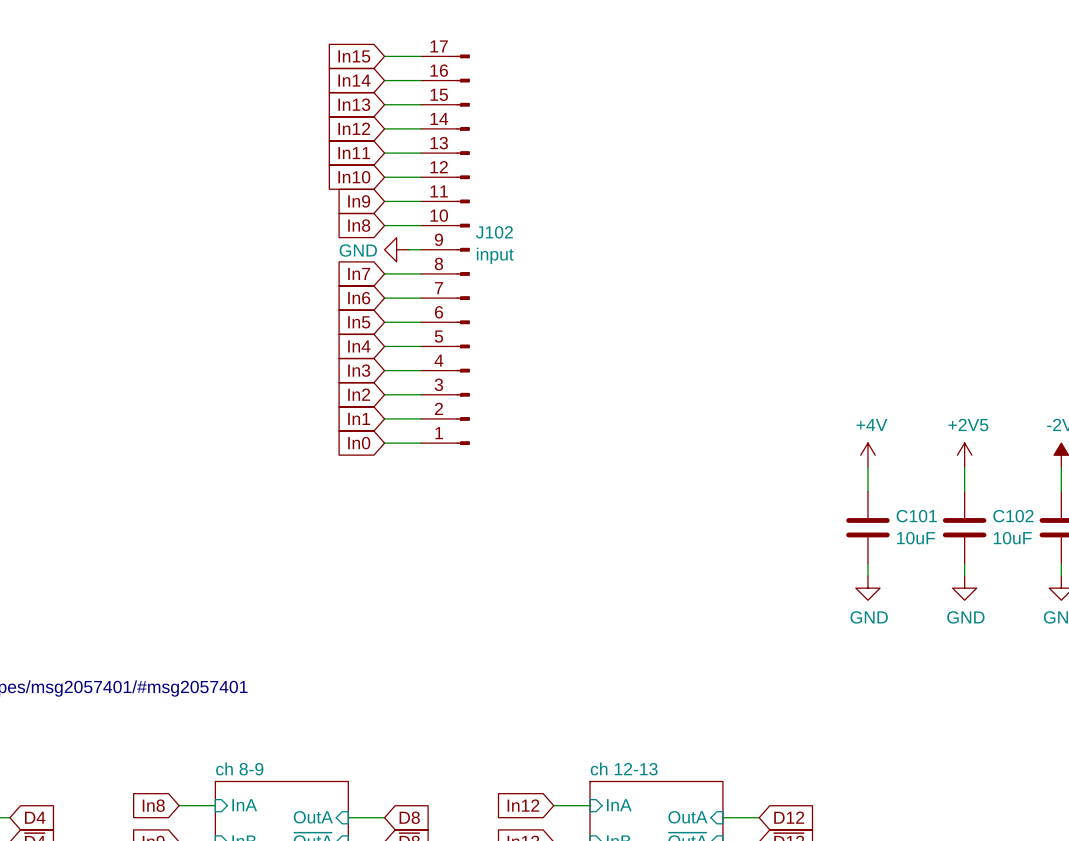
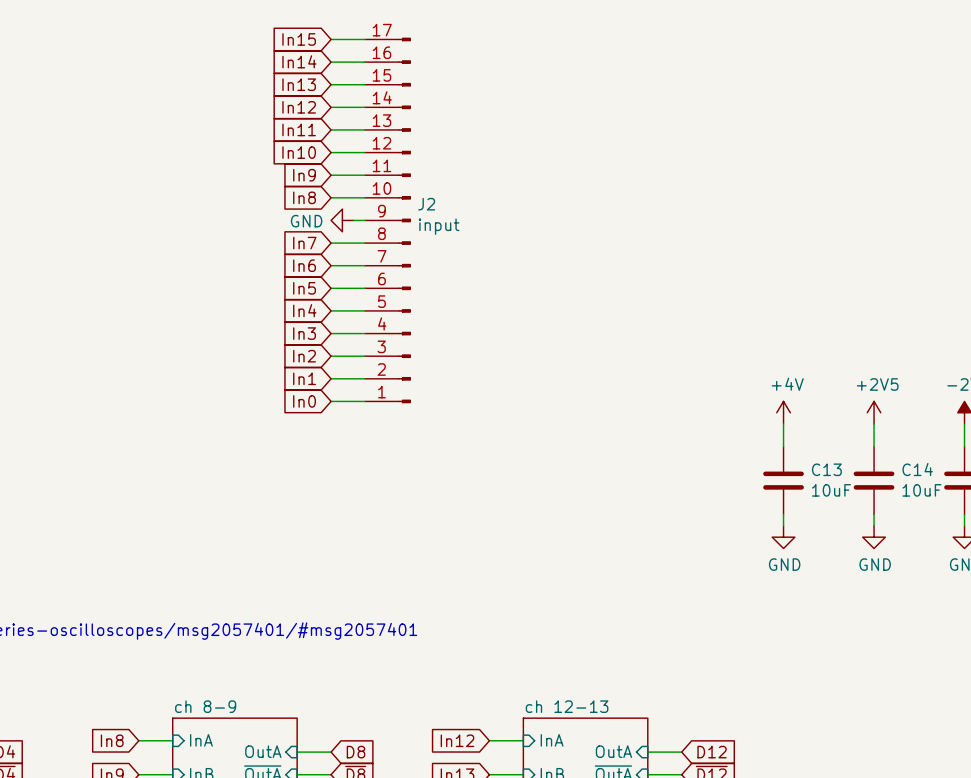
J102 name: J102 (494, 232) -> J2 (426, 204)
C101 name: C101 (916, 516) -> C13 (826, 469)
C102 name: C102 (1013, 516) -> C14 (917, 469)

